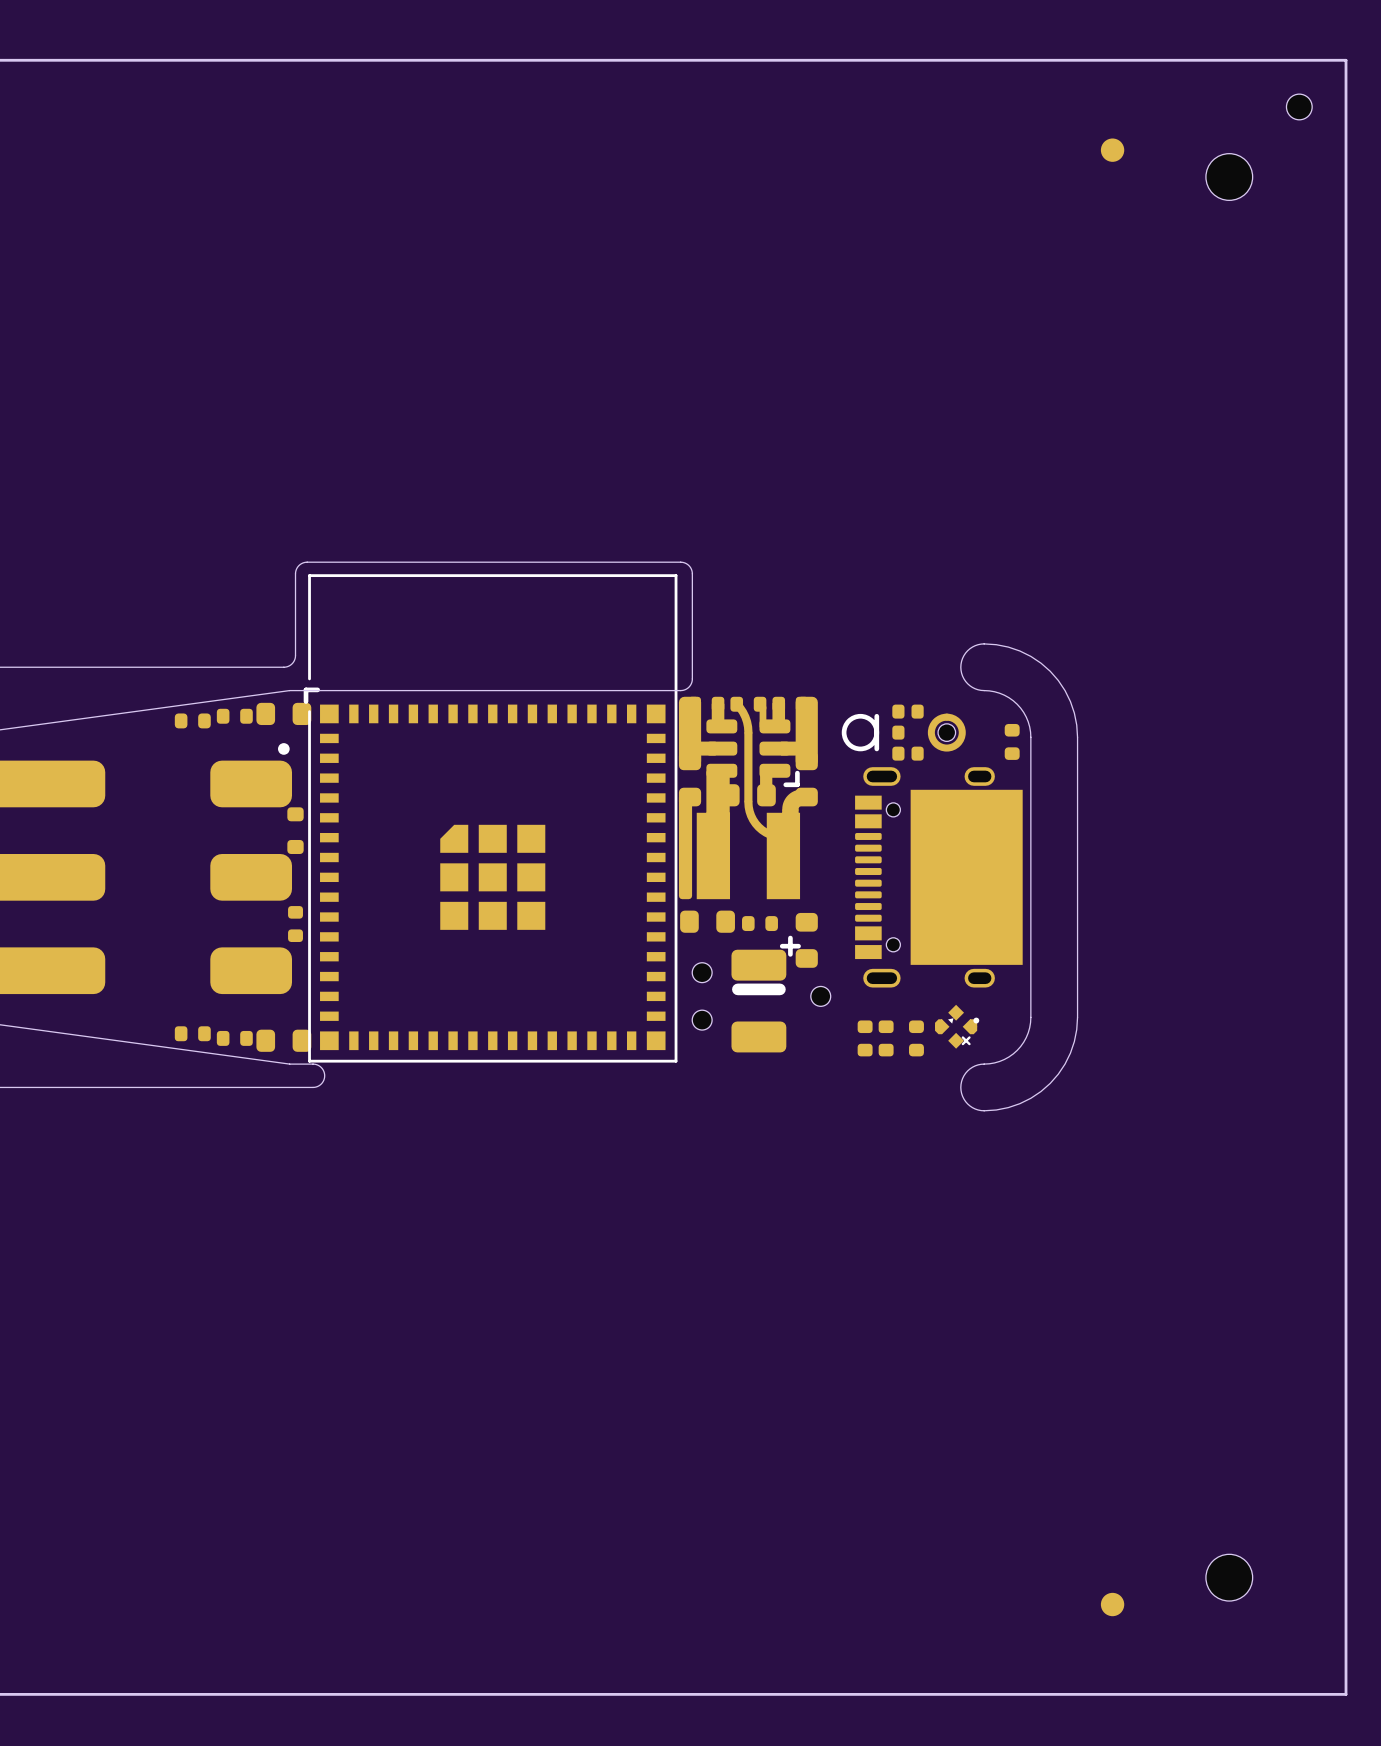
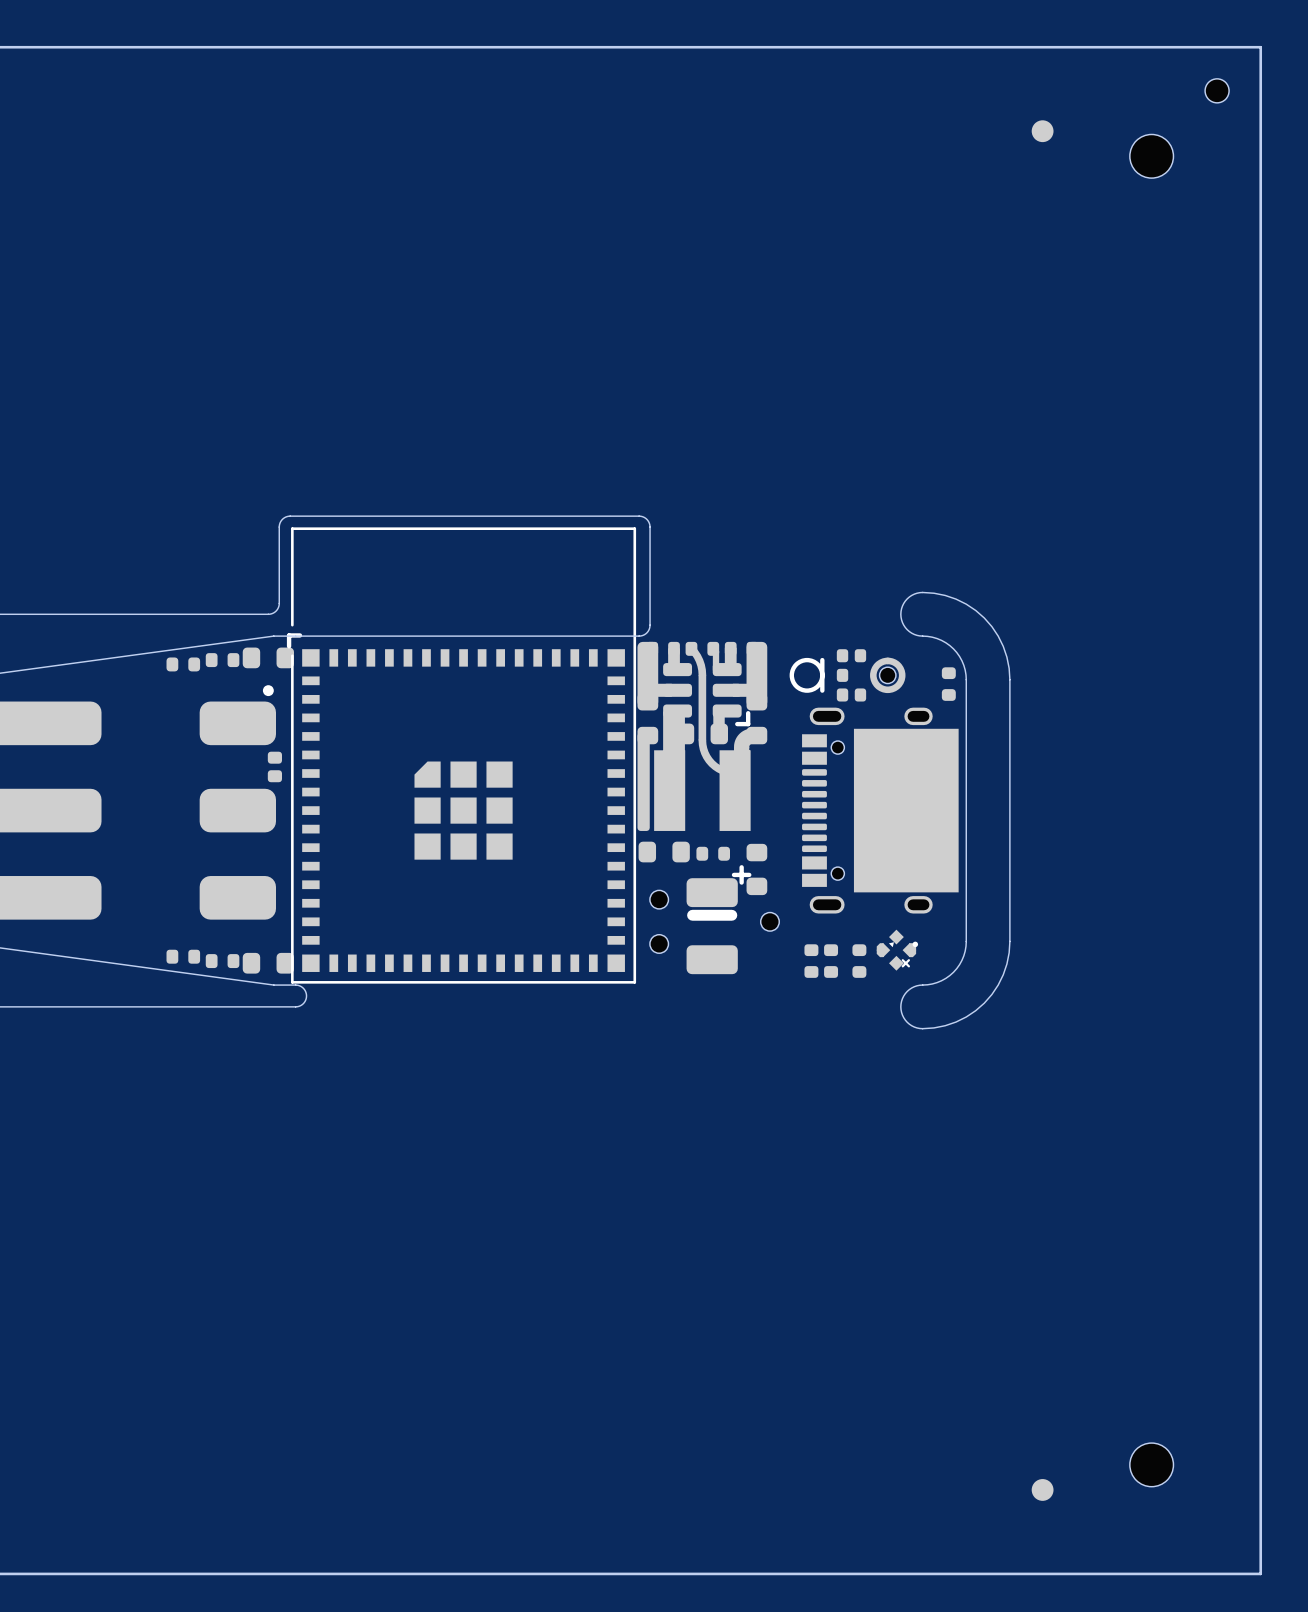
part footprint: [287, 807, 304, 854] -> [267, 751, 282, 783]
part: (295, 924) -> none

